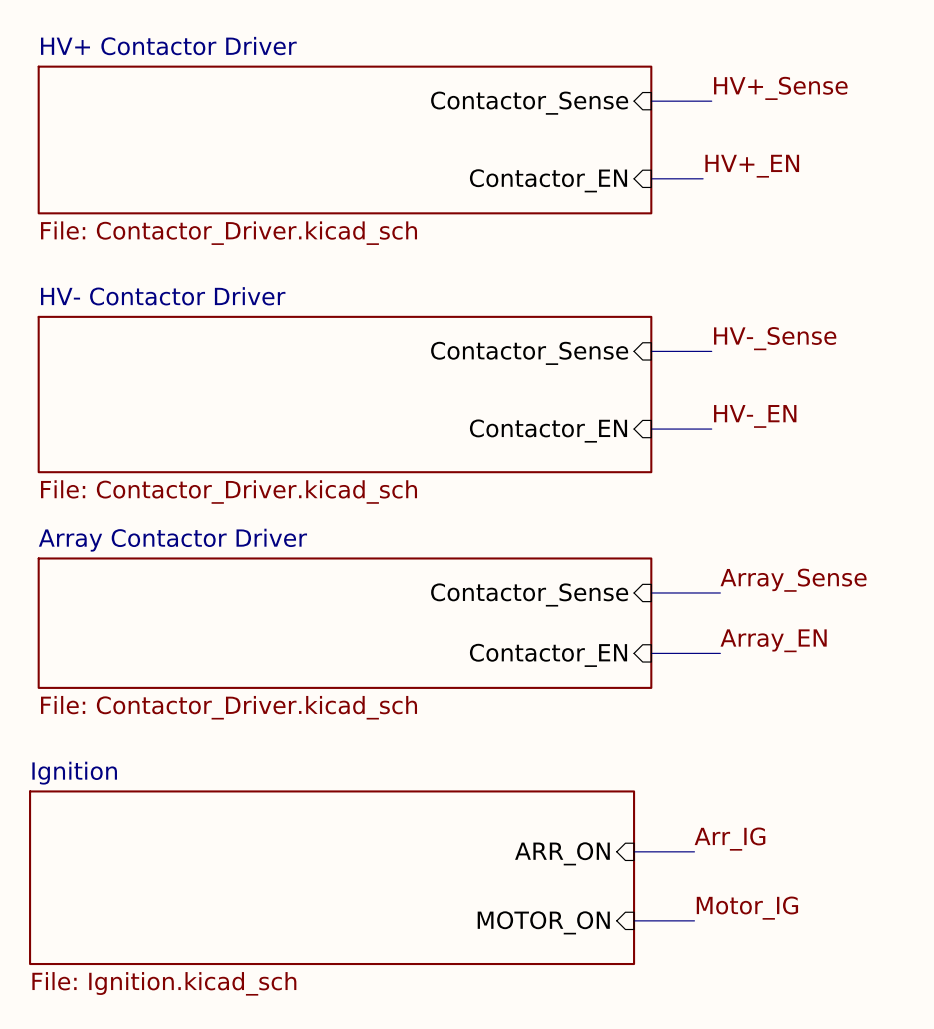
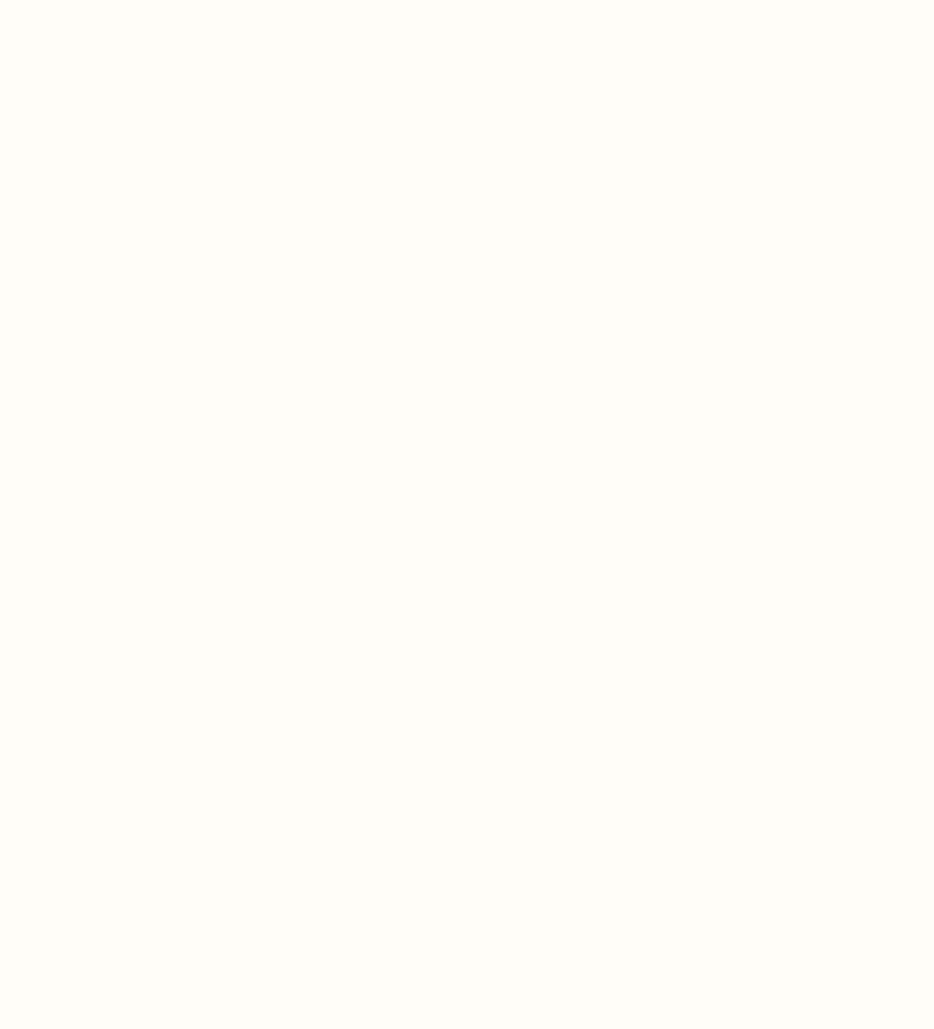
label: HV+_Sense (780, 88) -> none
wire: (651, 101) (711, 101) -> none
sheet pin: Contactor_Sense (529, 103) -> none
sheet HV+ Contactor Driver: File: Contactor_Driver.kicad_sch (345, 139) -> none
label: HV+_EN (752, 166) -> none
wire: (651, 178) (703, 178) -> none
sheet pin: Contactor_EN (548, 180) -> none
label: HV-_Sense (775, 338) -> none
wire: (651, 351) (711, 351) -> none
sheet pin: Contactor_Sense (529, 353) -> none
sheet HV- Contactor Driver: File: Contactor_Driver.kicad_sch (345, 394) -> none
label: HV-_EN (755, 416) -> none
wire: (651, 429) (711, 429) -> none
sheet pin: Contactor_EN (548, 431) -> none
label: Array_Sense (793, 580) -> none
wire: (651, 592) (720, 592) -> none
sheet pin: Contactor_Sense (529, 594) -> none
sheet Array Contactor Driver: File: Contactor_Driver.kicad_sch (345, 623) -> none
label: Array_EN (773, 640) -> none
wire: (651, 653) (720, 653) -> none
sheet pin: Contactor_EN (548, 655) -> none
label: Arr_IG (729, 839) -> none
wire: (634, 851) (694, 851) -> none
sheet pin: ARR_ON (562, 853) -> none
sheet Ignition: File: Ignition.kicad_sch (332, 877) -> none
label: Motor_IG (747, 908) -> none
wire: (634, 920) (694, 920) -> none
sheet pin: MOTOR_ON (543, 922) -> none

